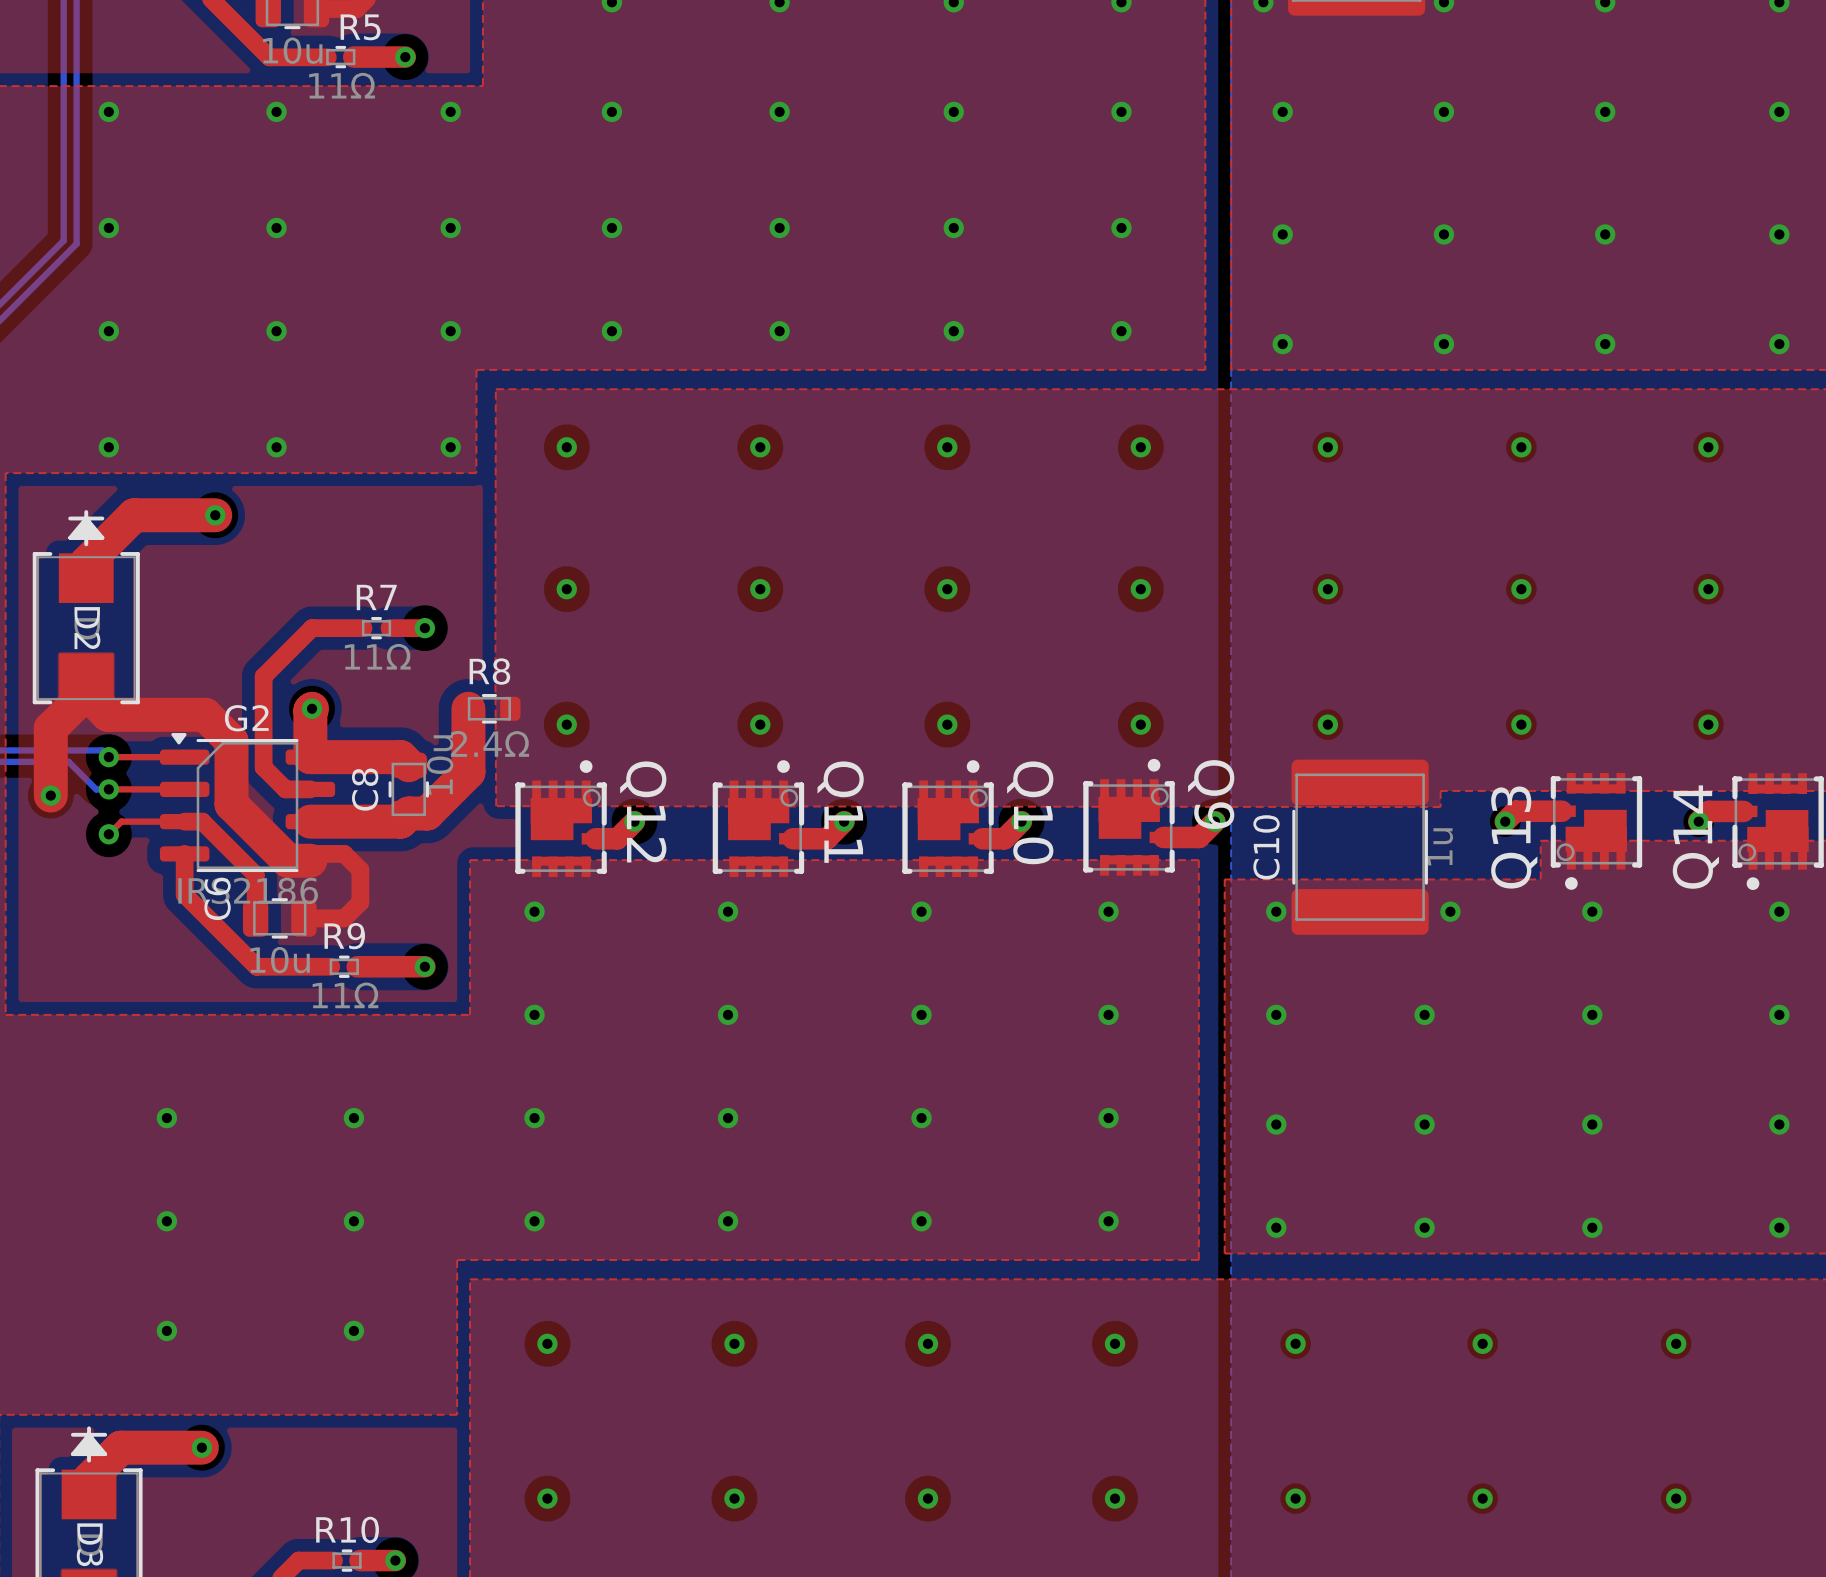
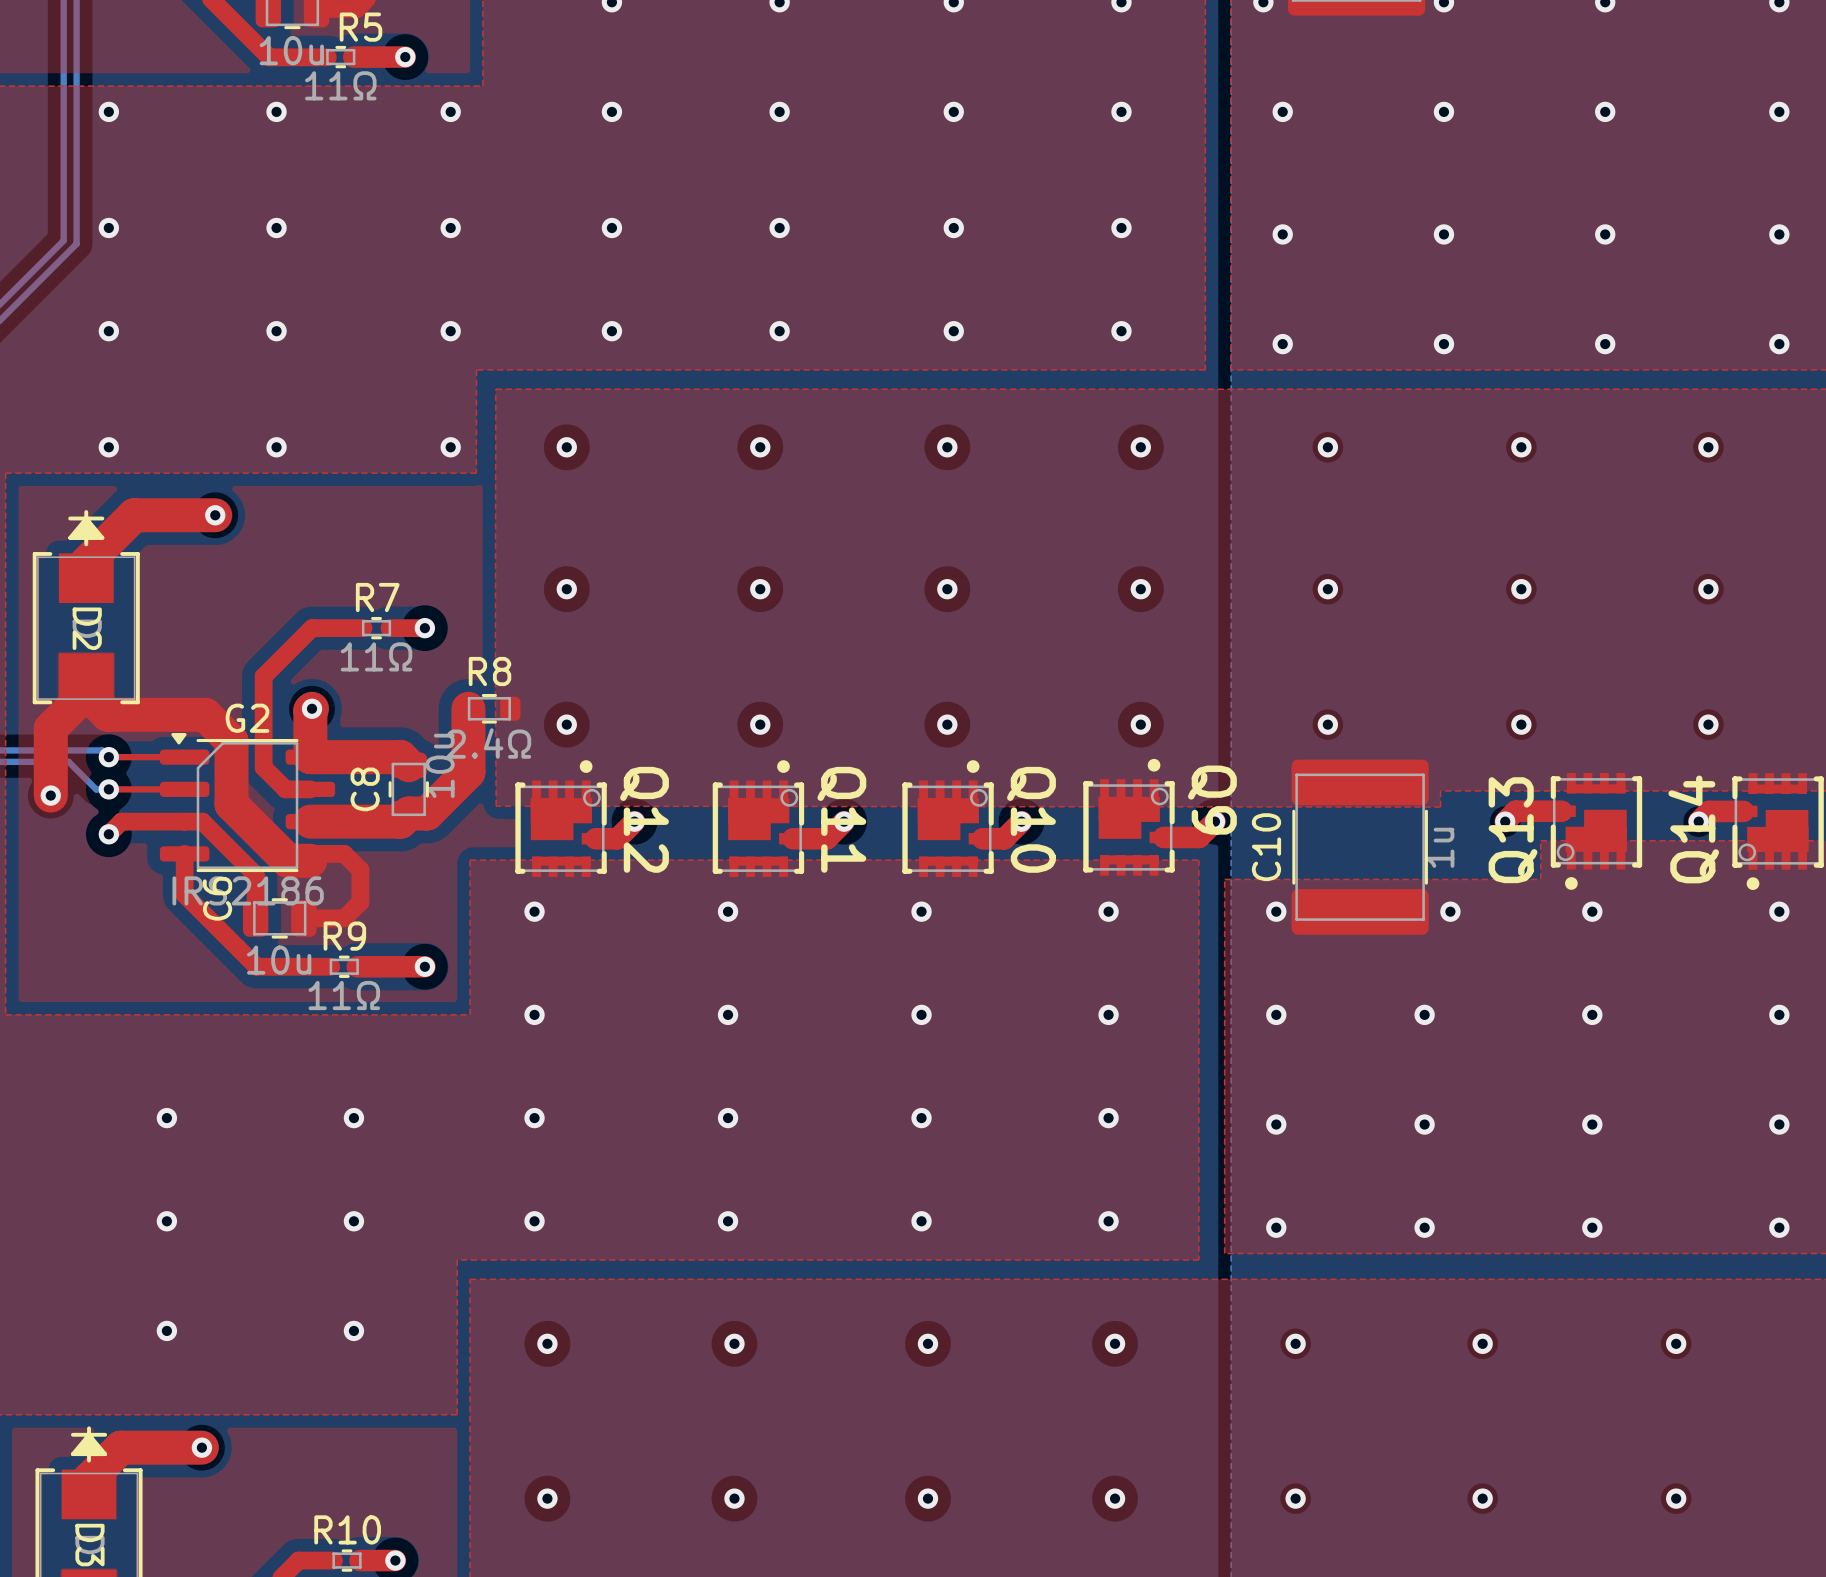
top track width: thin (184, 821) (121, 821) (108, 834) -> thick (184, 821) (121, 821) (108, 834)

